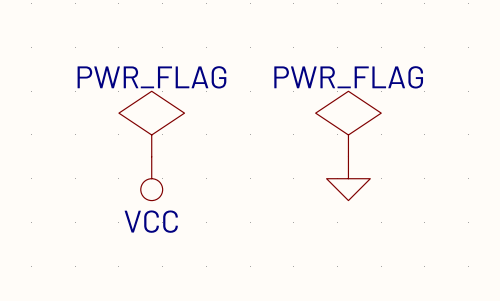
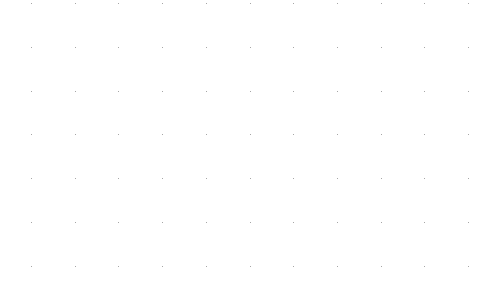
power symbol: PWR_FLAG (151, 124) -> none
power symbol: PWR_FLAG (348, 124) -> none
power symbol: VCC (151, 178) -> none
power symbol: (348, 178) -> none

